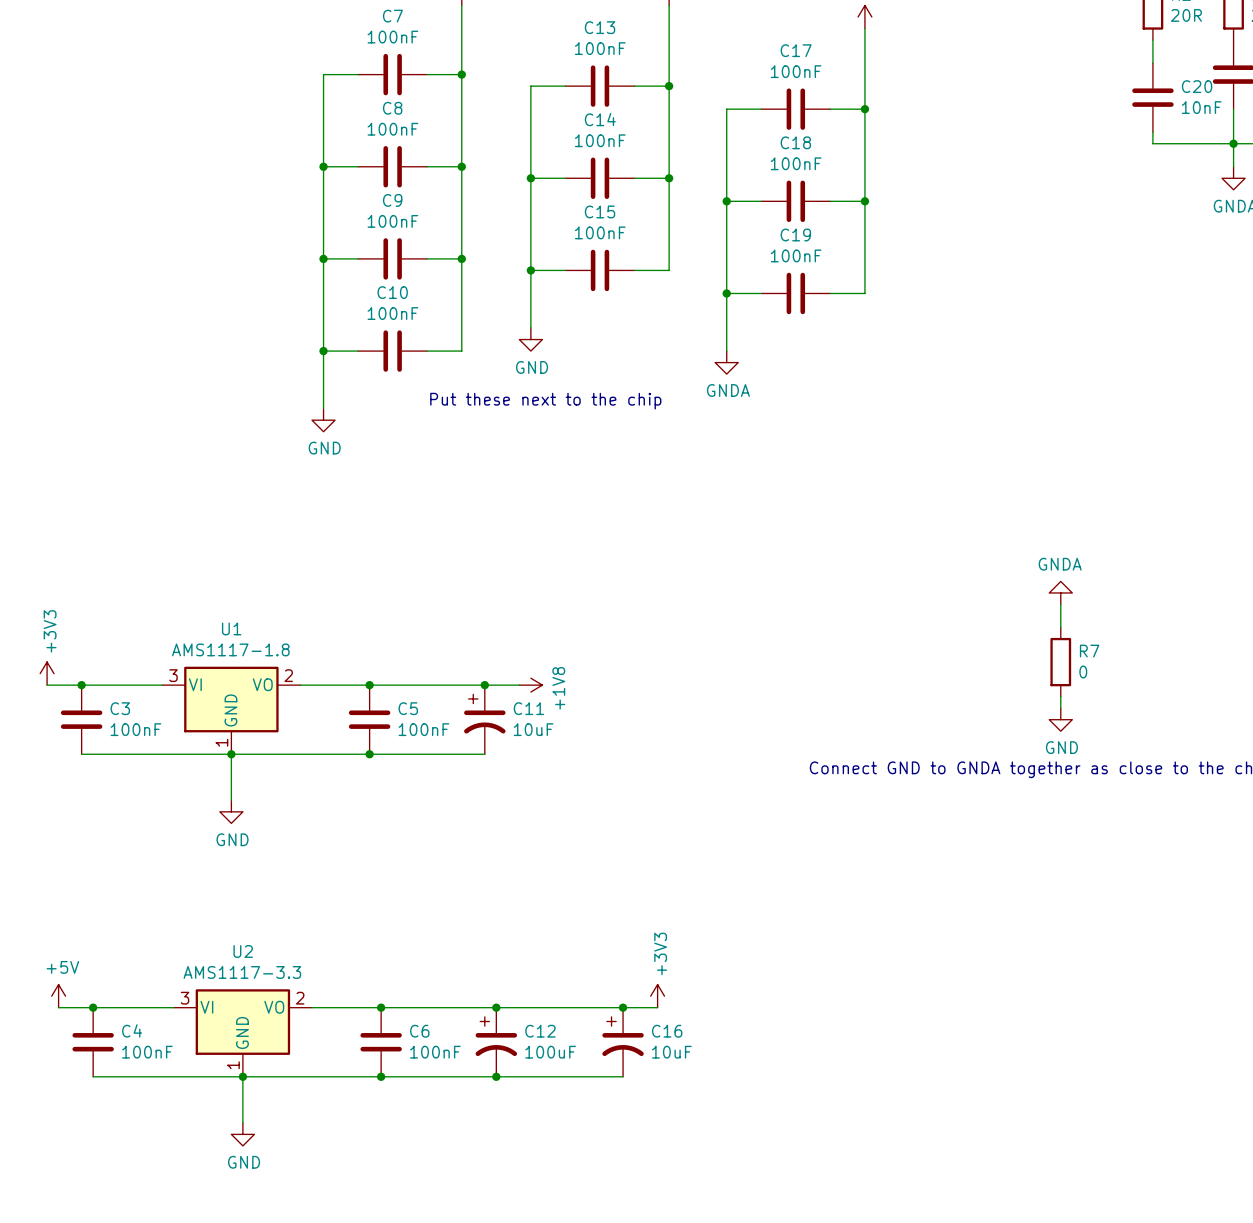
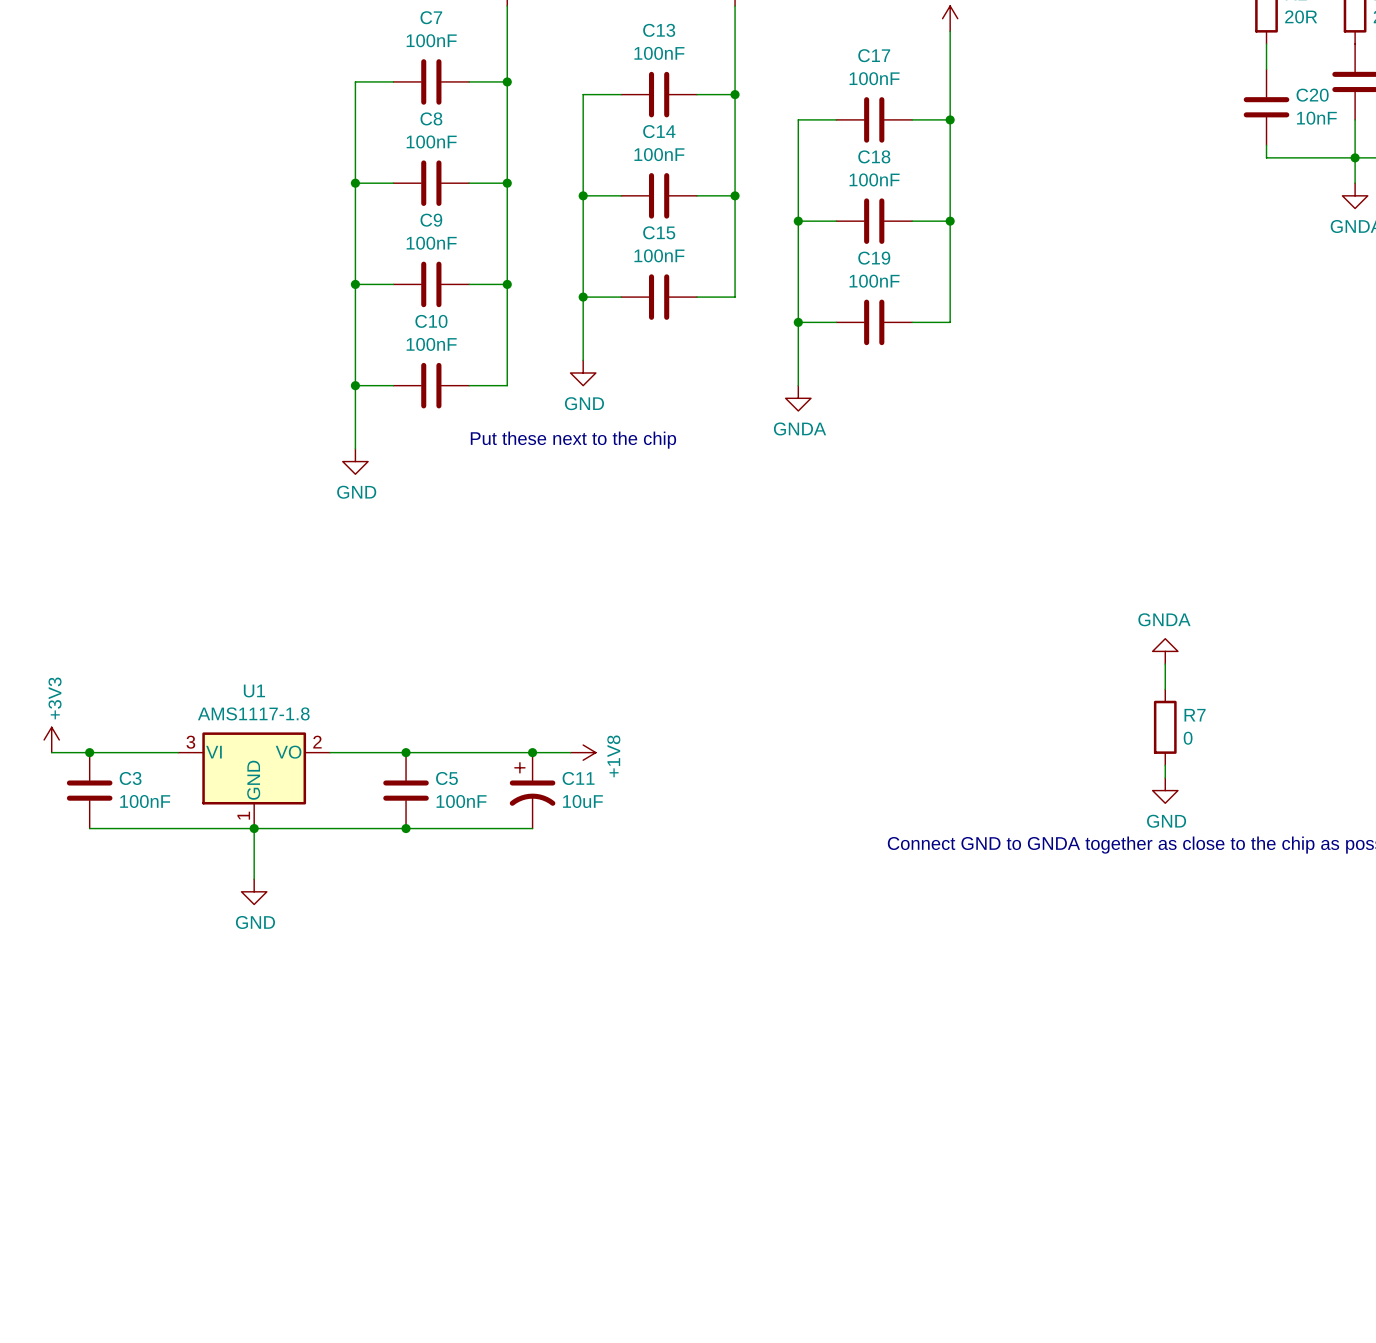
power symbol: +5V (58, 996) -> none
power symbol: +3V3 (657, 996) -> none
wire: (58, 1007) (173, 1007) -> none
junction: (93, 1007) -> none
wire: (312, 1007) (657, 1007) -> none
junction: (381, 1007) -> none
junction: (496, 1007) -> none
junction: (623, 1007) -> none
U2: AMS1117-3.3 (242, 1033) -> none
C4: 100nF (93, 1042) -> none
C6: 100nF (381, 1042) -> none
C12: 100uF (496, 1042) -> none
C16: 10uF (623, 1042) -> none
wire: (93, 1076) (623, 1076) -> none
wire: (242, 1076) (242, 1122) -> none
junction: (242, 1076) -> none
junction: (381, 1076) -> none
junction: (496, 1076) -> none
power symbol: GND (242, 1134) -> none

